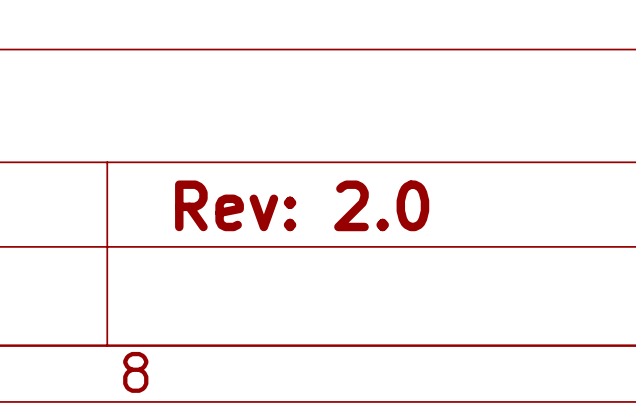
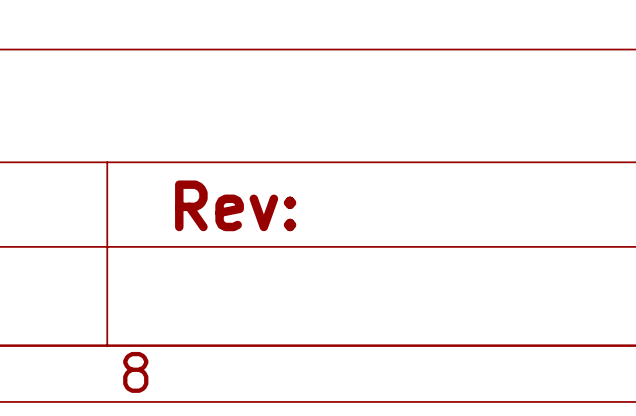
title block: Rev: 2.0 (302, 205) -> Rev: (235, 205)

